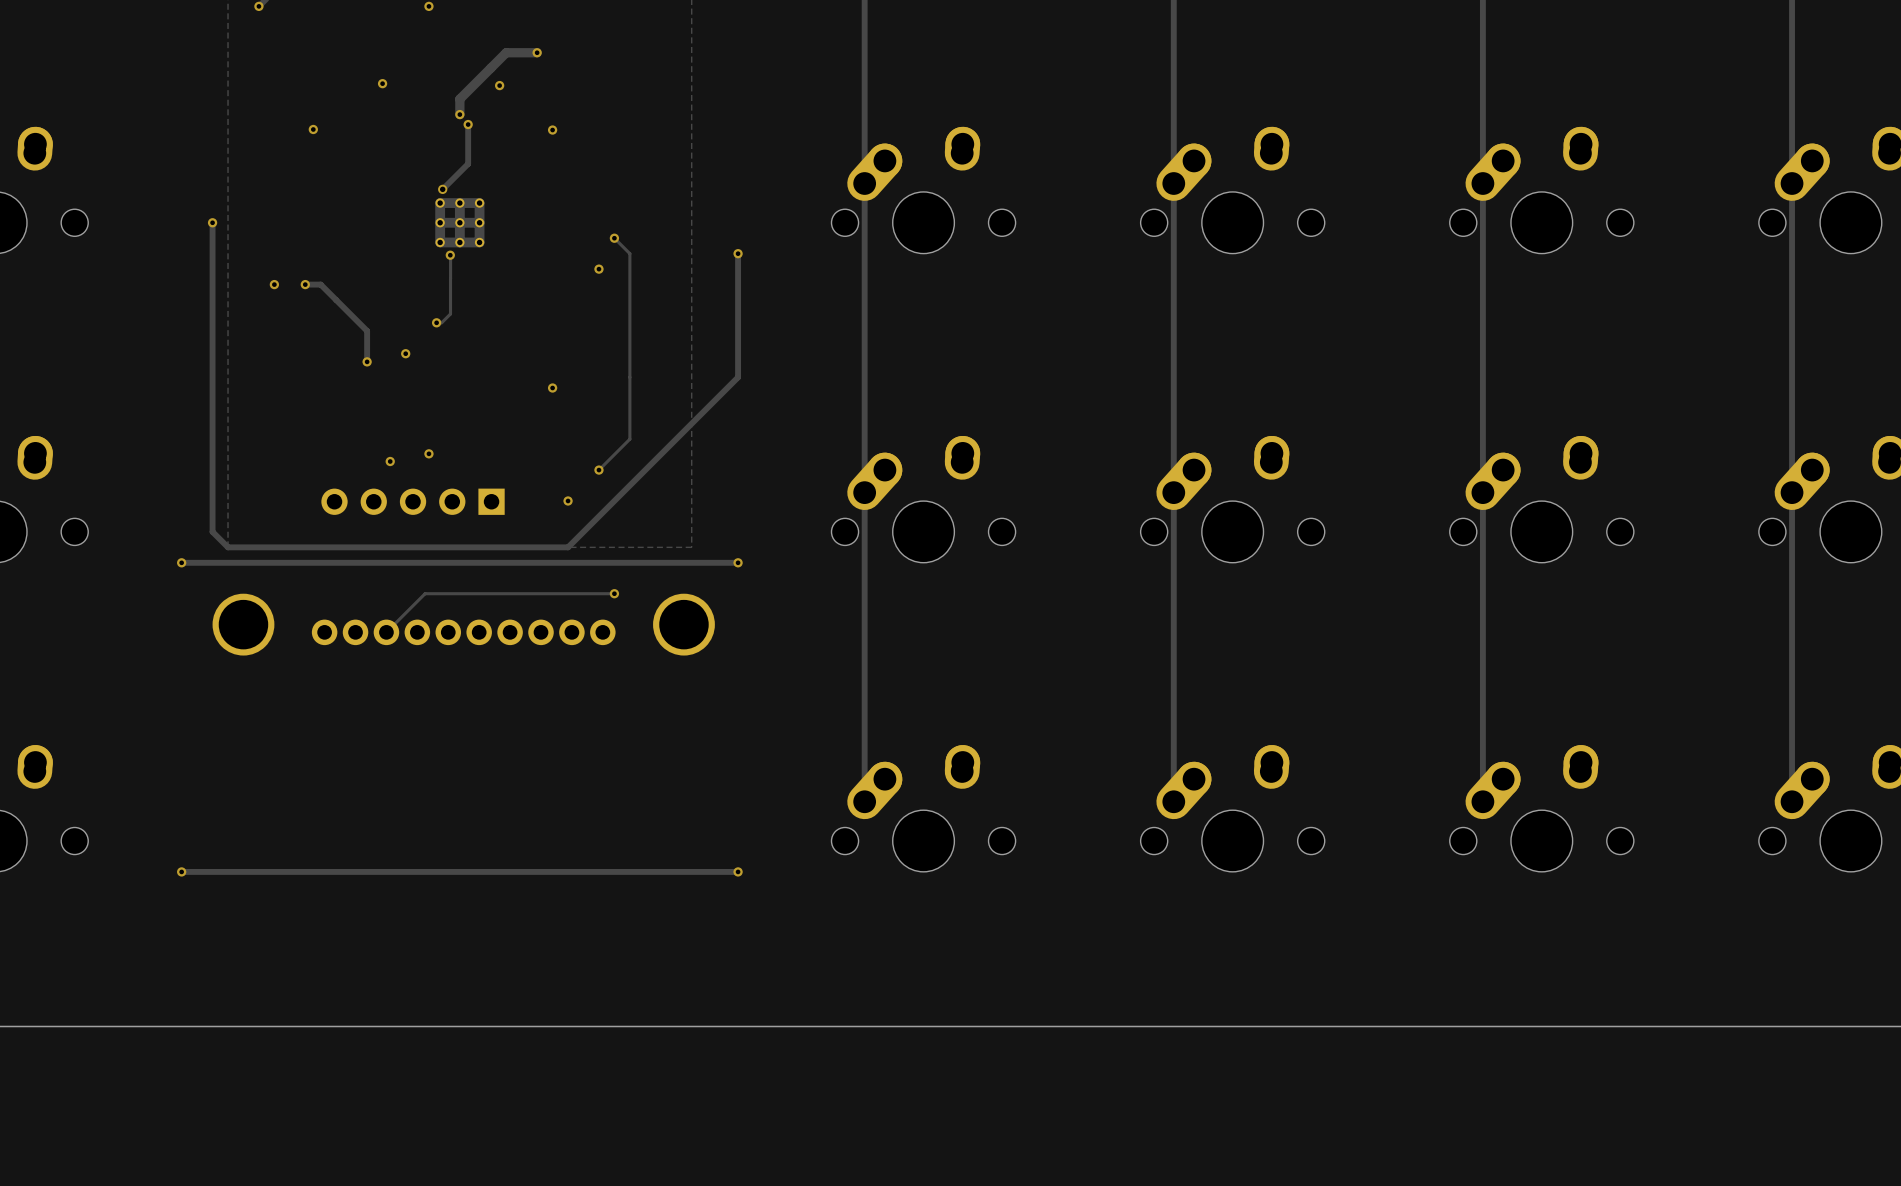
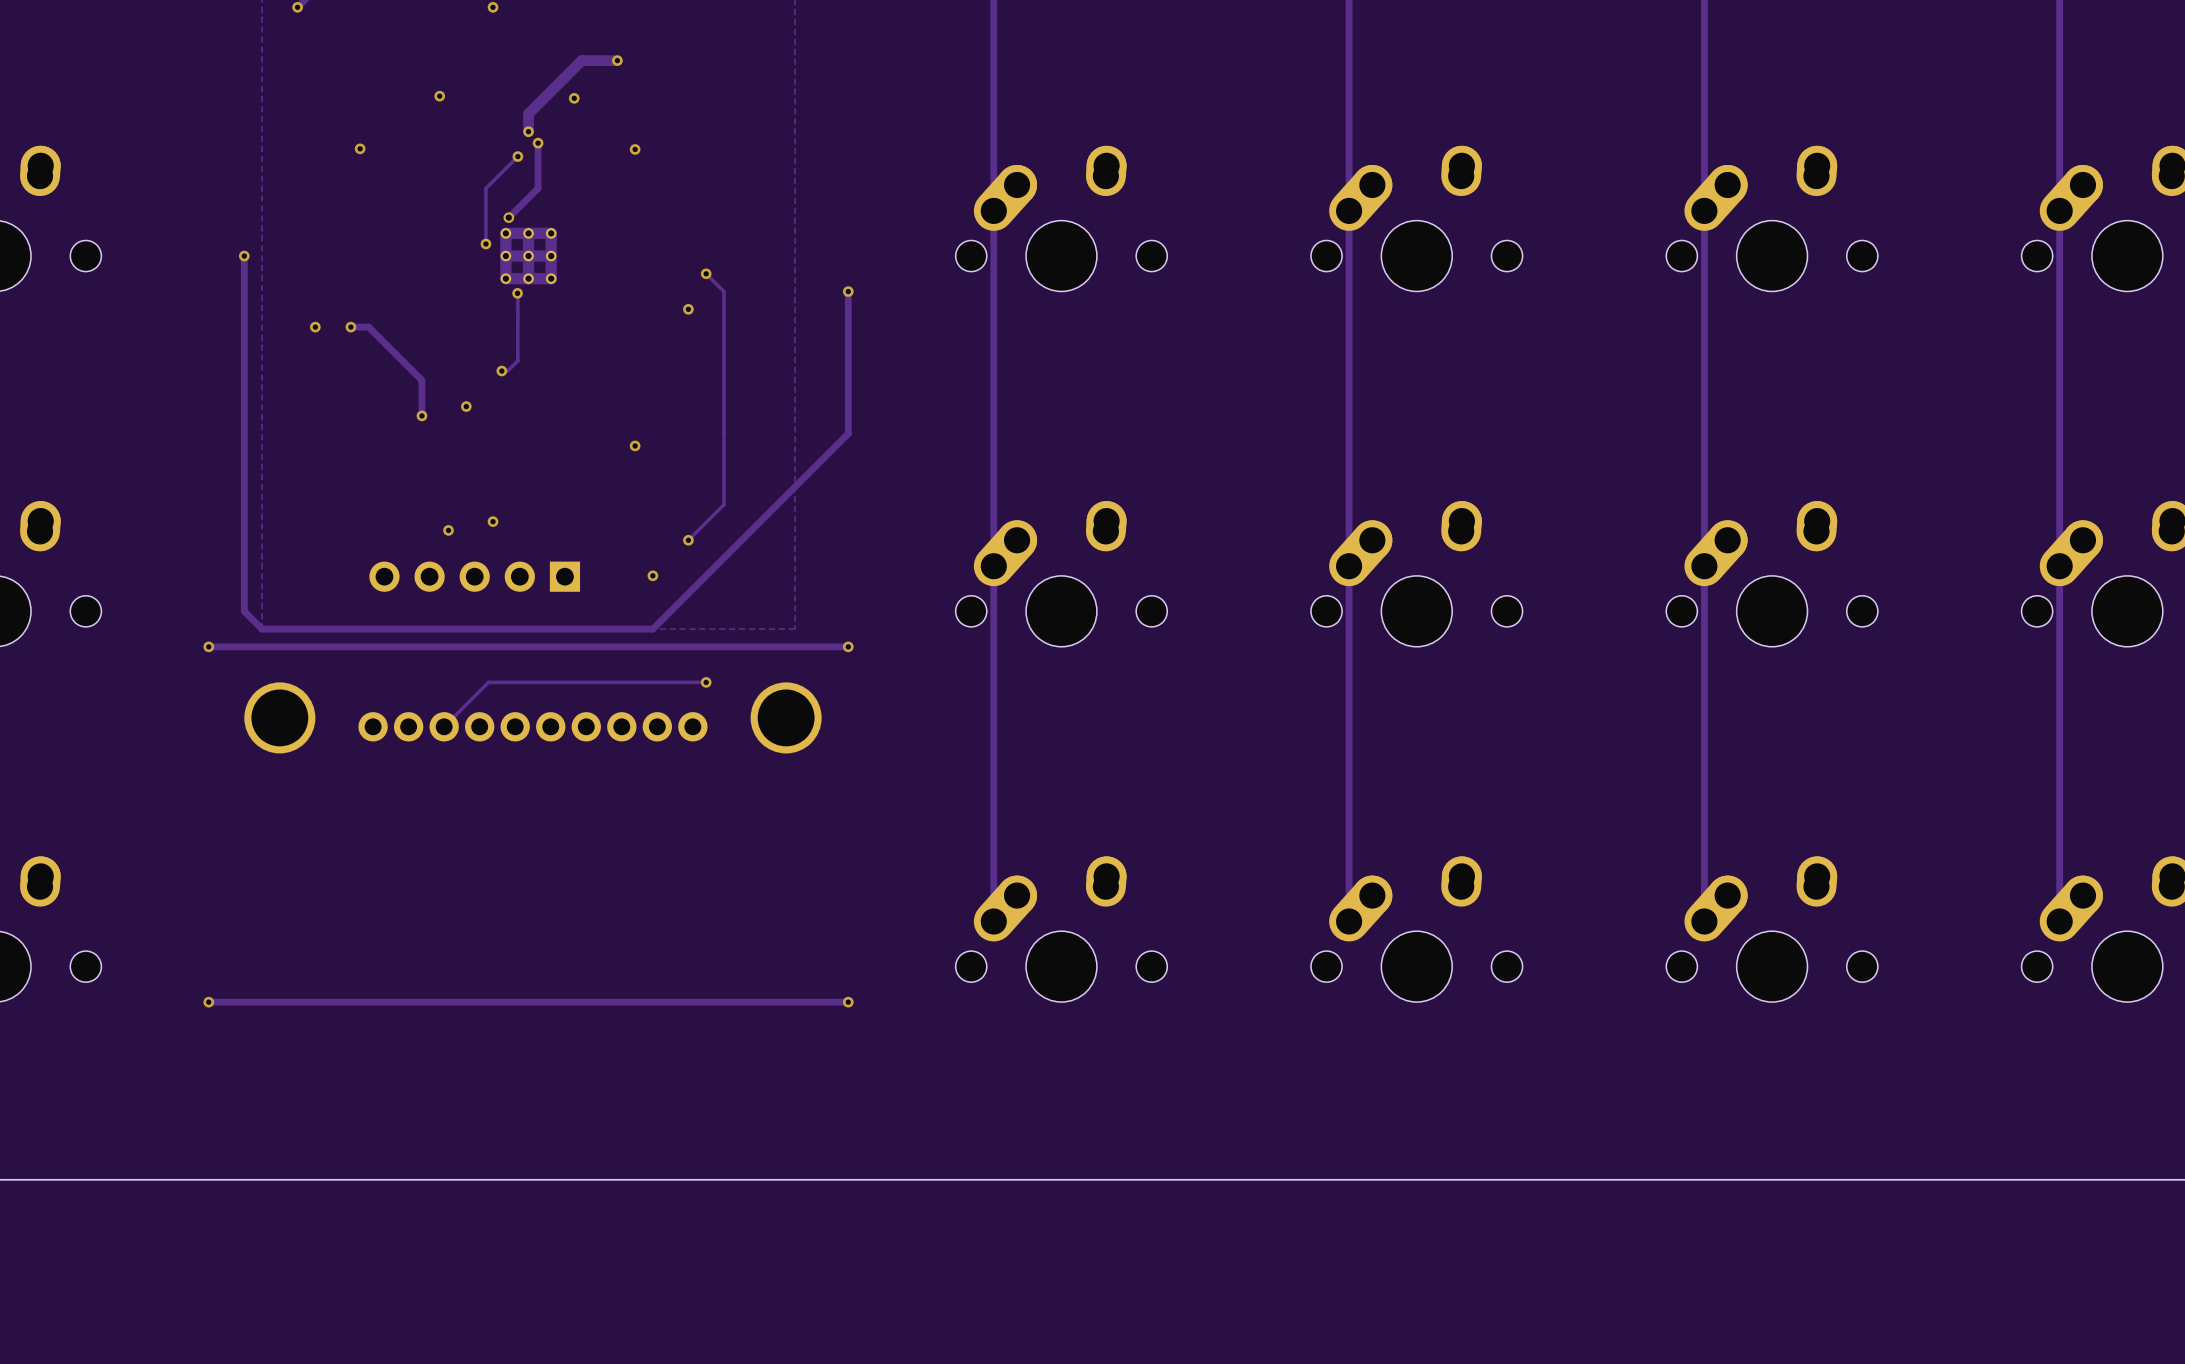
track: none -> (517, 156) (485, 188) (485, 244)
via: none -> (517, 156)
via: none -> (485, 244)

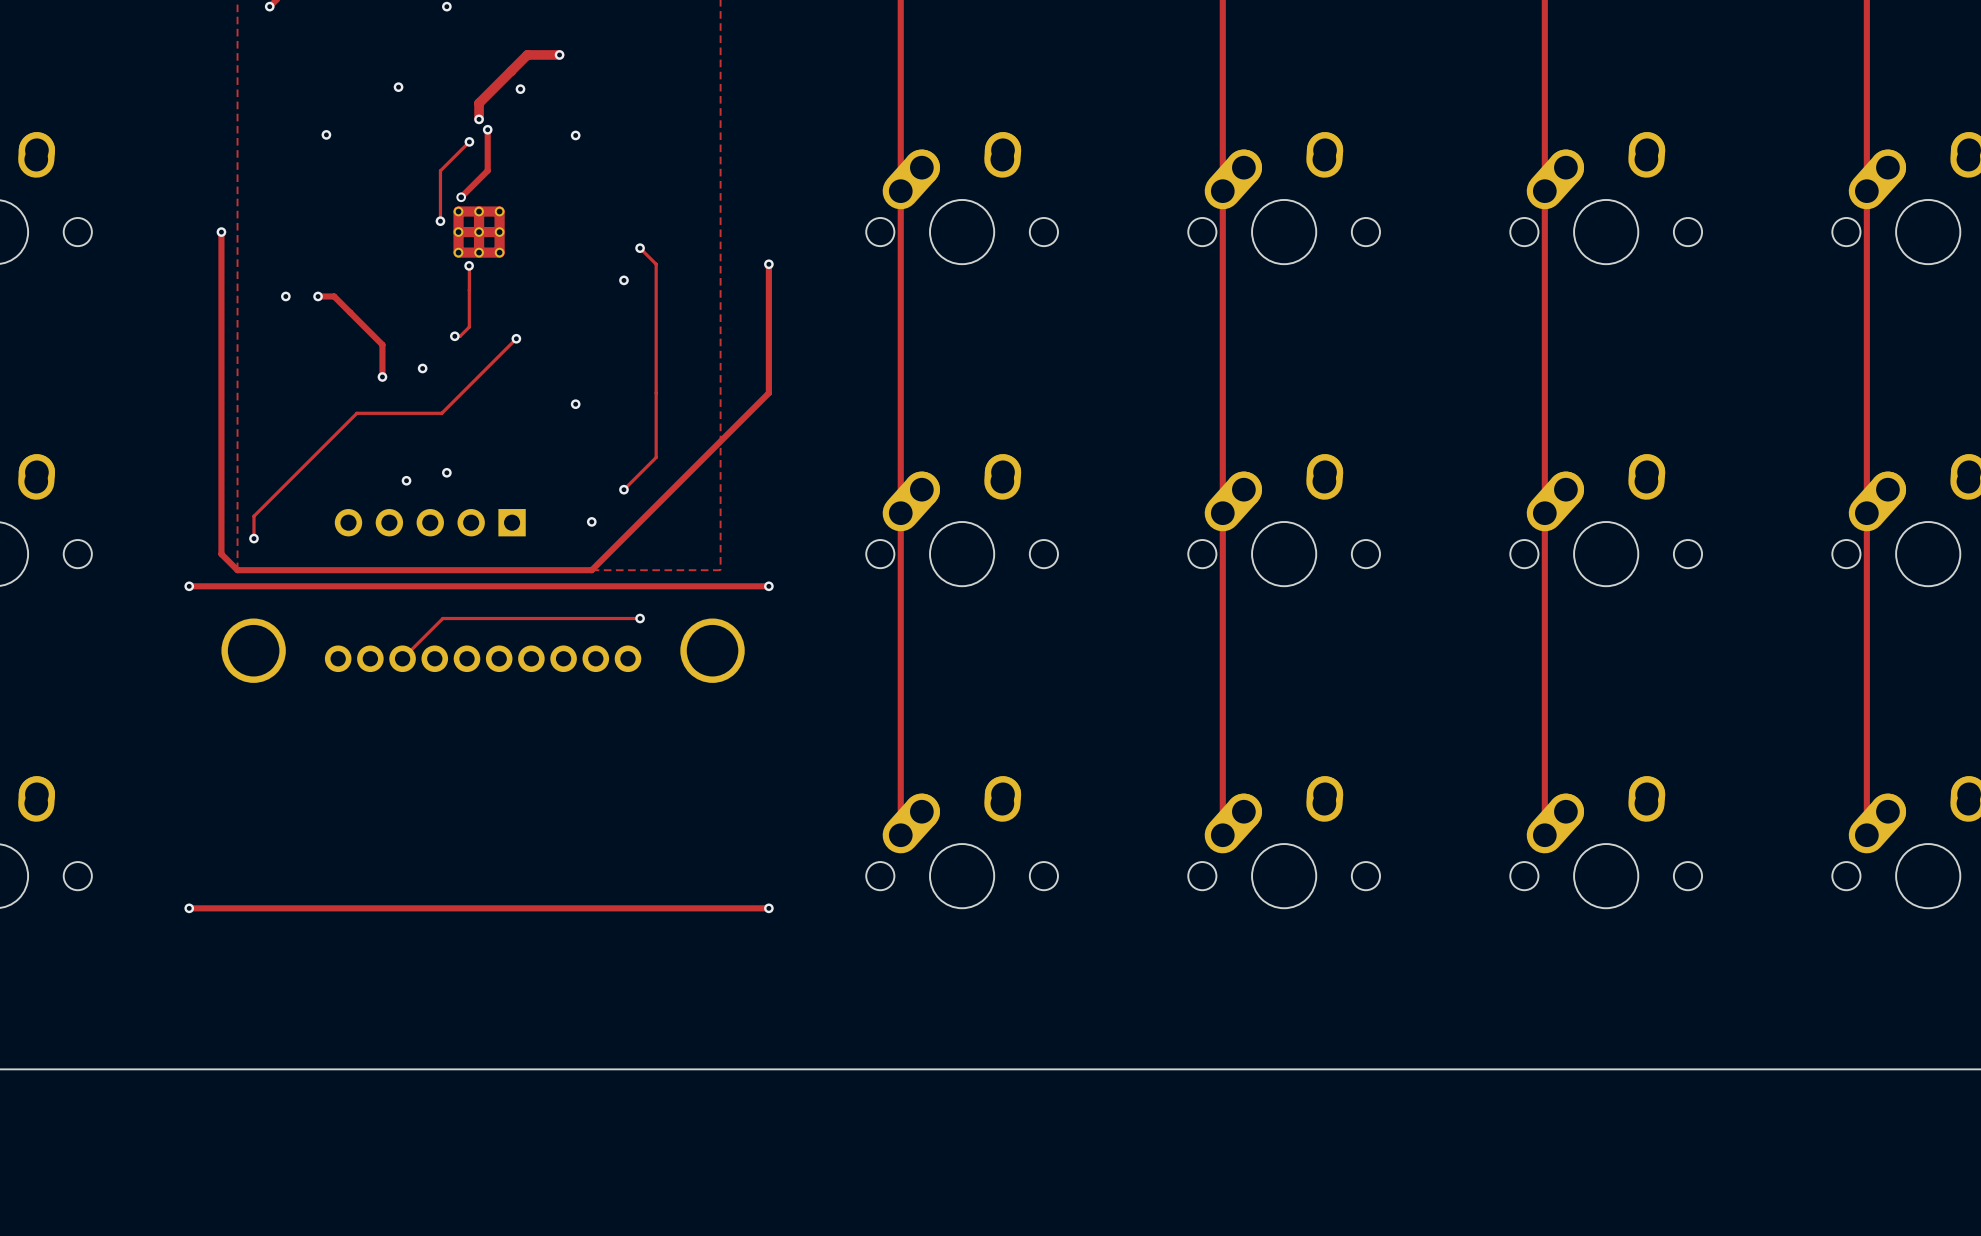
track: none -> (516, 338) (441, 413) (356, 413) (253, 516) (253, 538)
via: none -> (516, 338)
via: none -> (253, 538)

